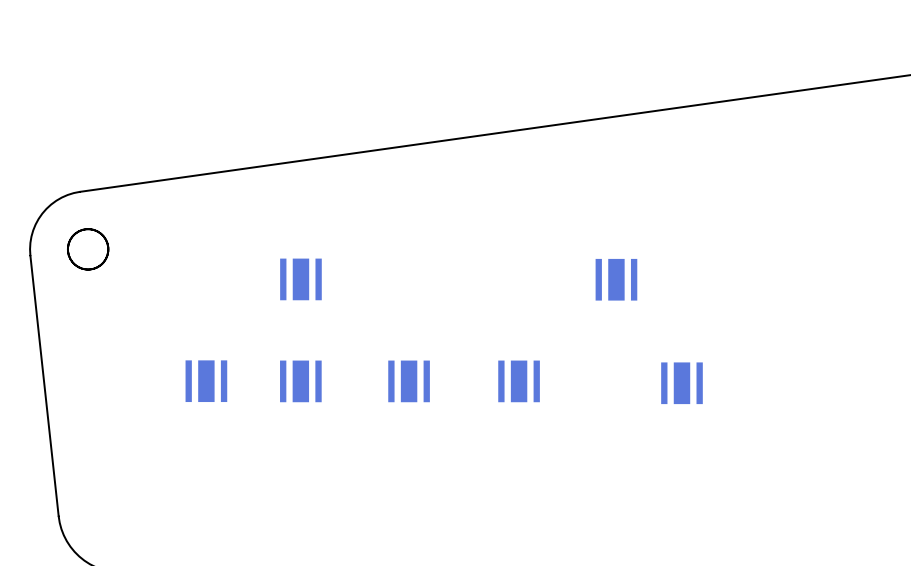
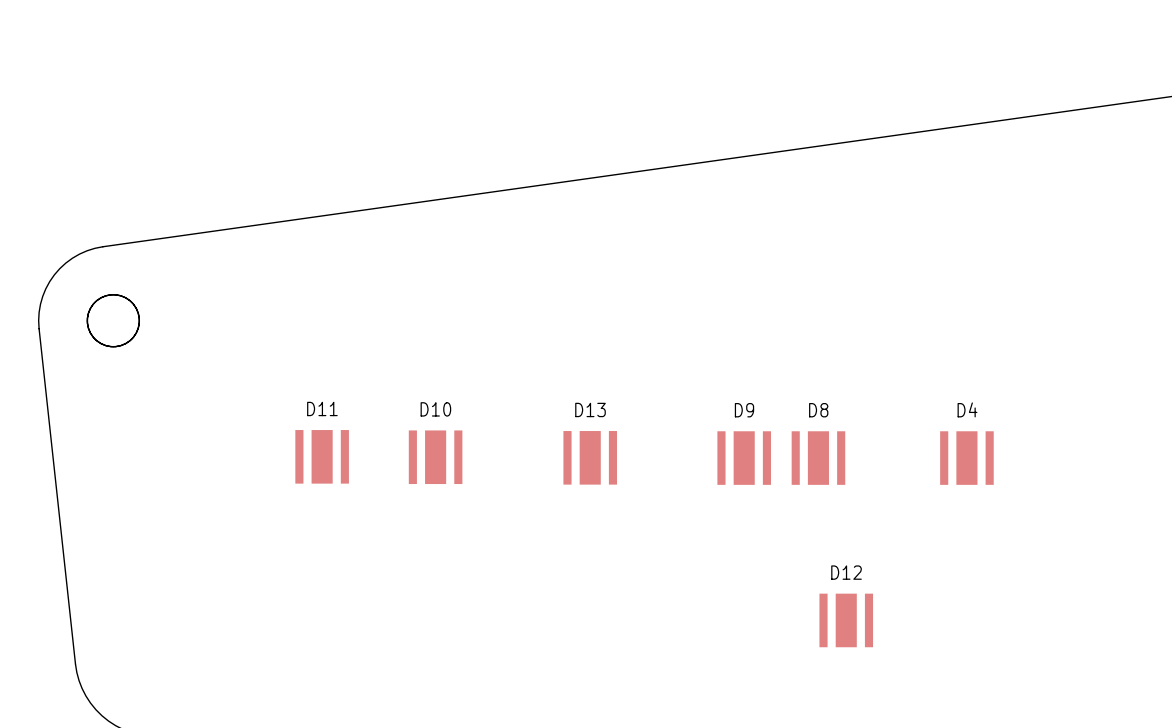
D11 side: bottom (300, 279) -> top (322, 456)
D10 side: bottom (616, 279) -> top (435, 457)
D13 side: bottom (206, 381) -> top (590, 457)
D9 side: bottom (300, 381) -> top (744, 458)
D8 side: bottom (409, 381) -> top (818, 458)
D12 side: bottom (519, 381) -> top (846, 620)
D4 side: bottom (681, 383) -> top (966, 458)

